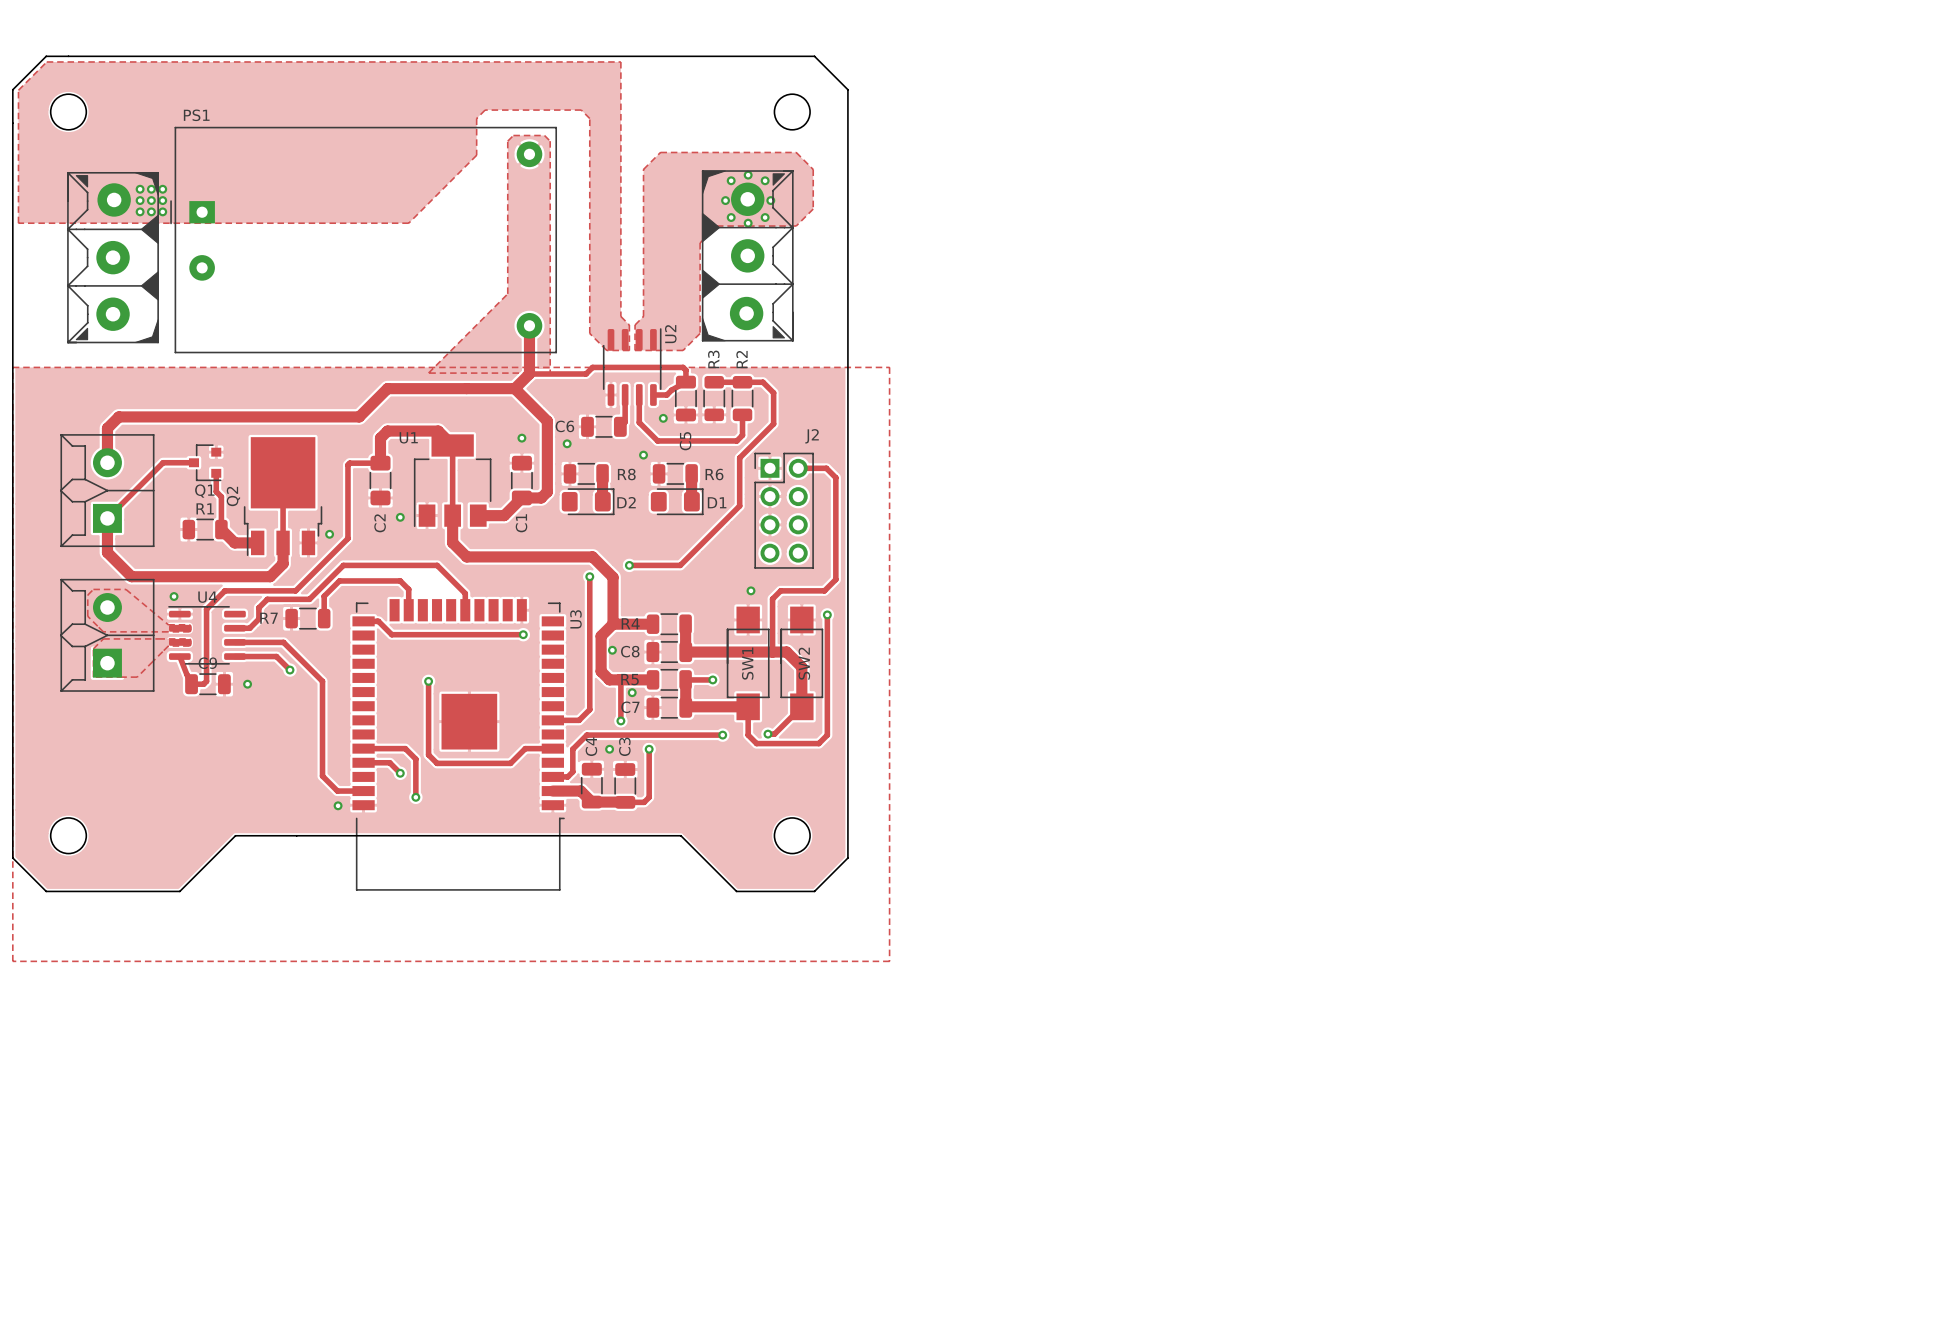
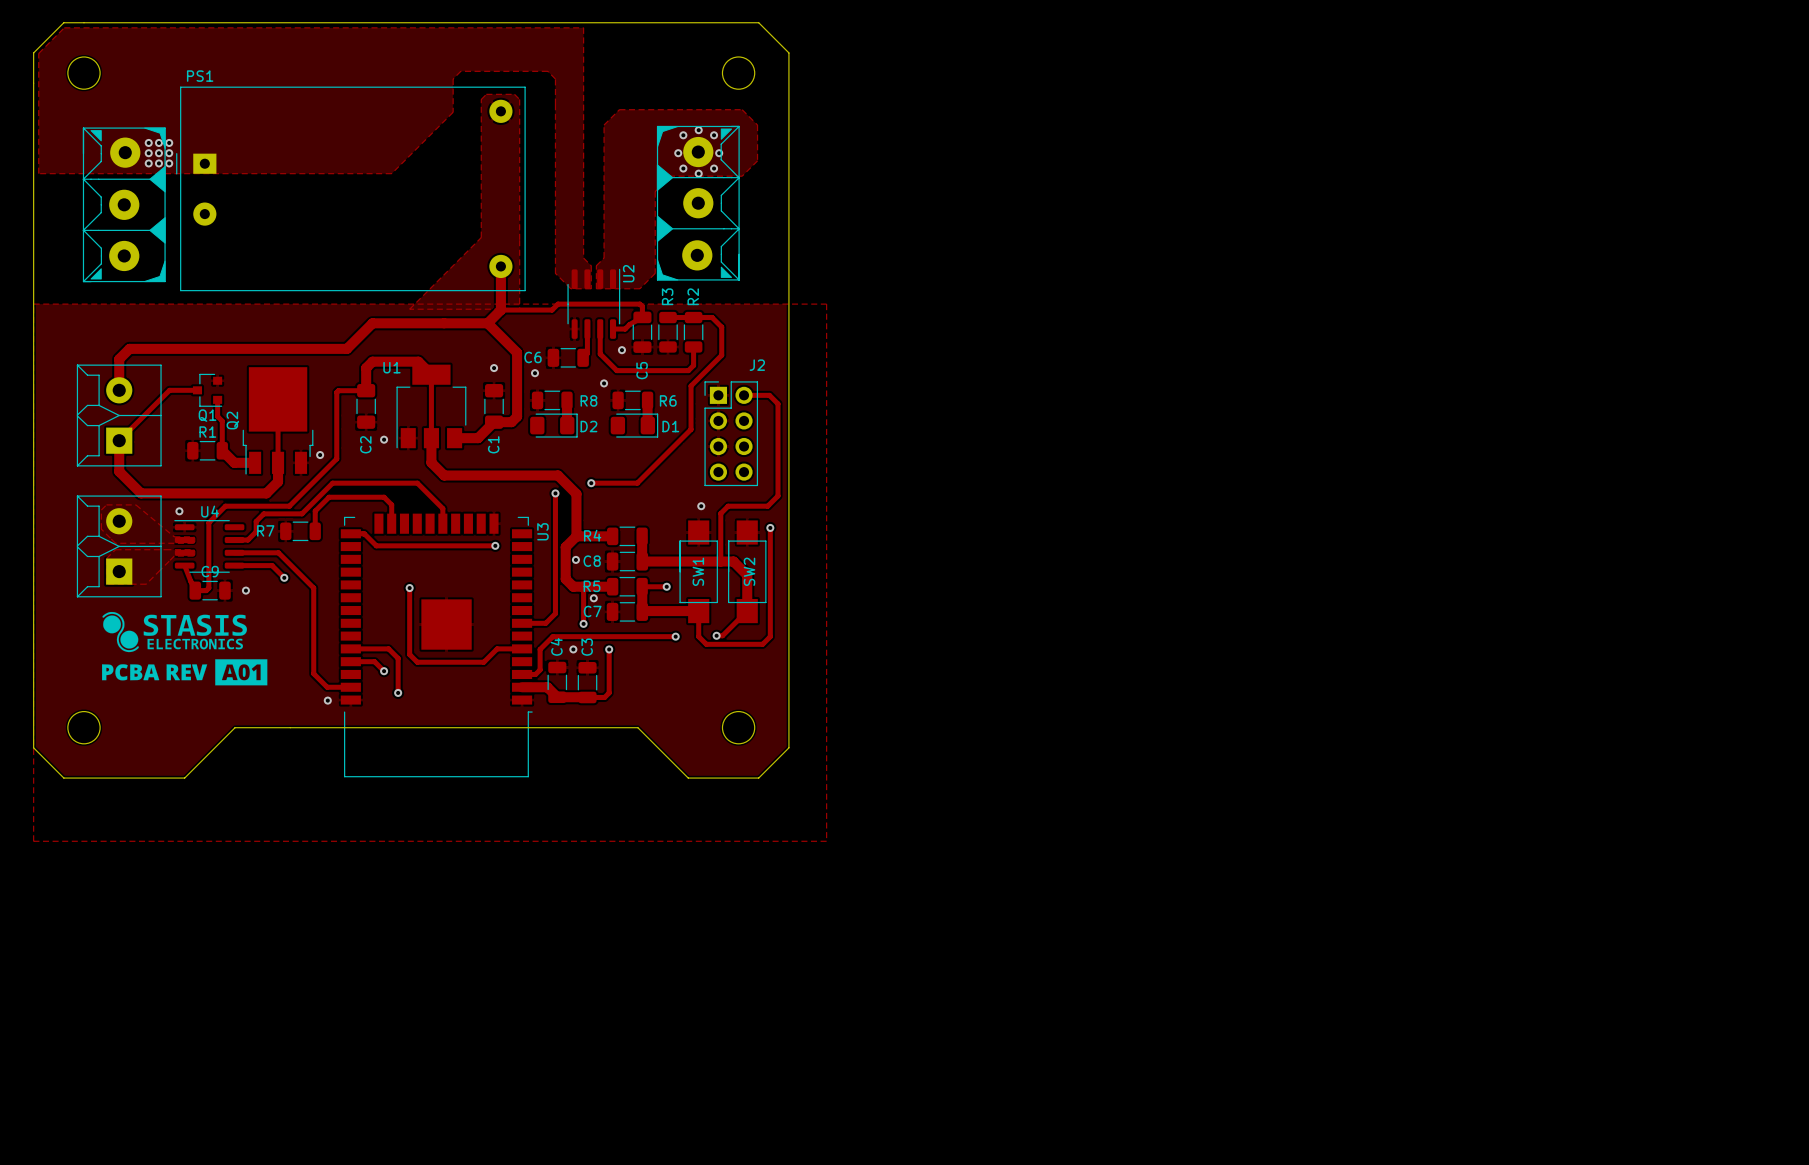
drawing: none -> [102, 611, 268, 686]

